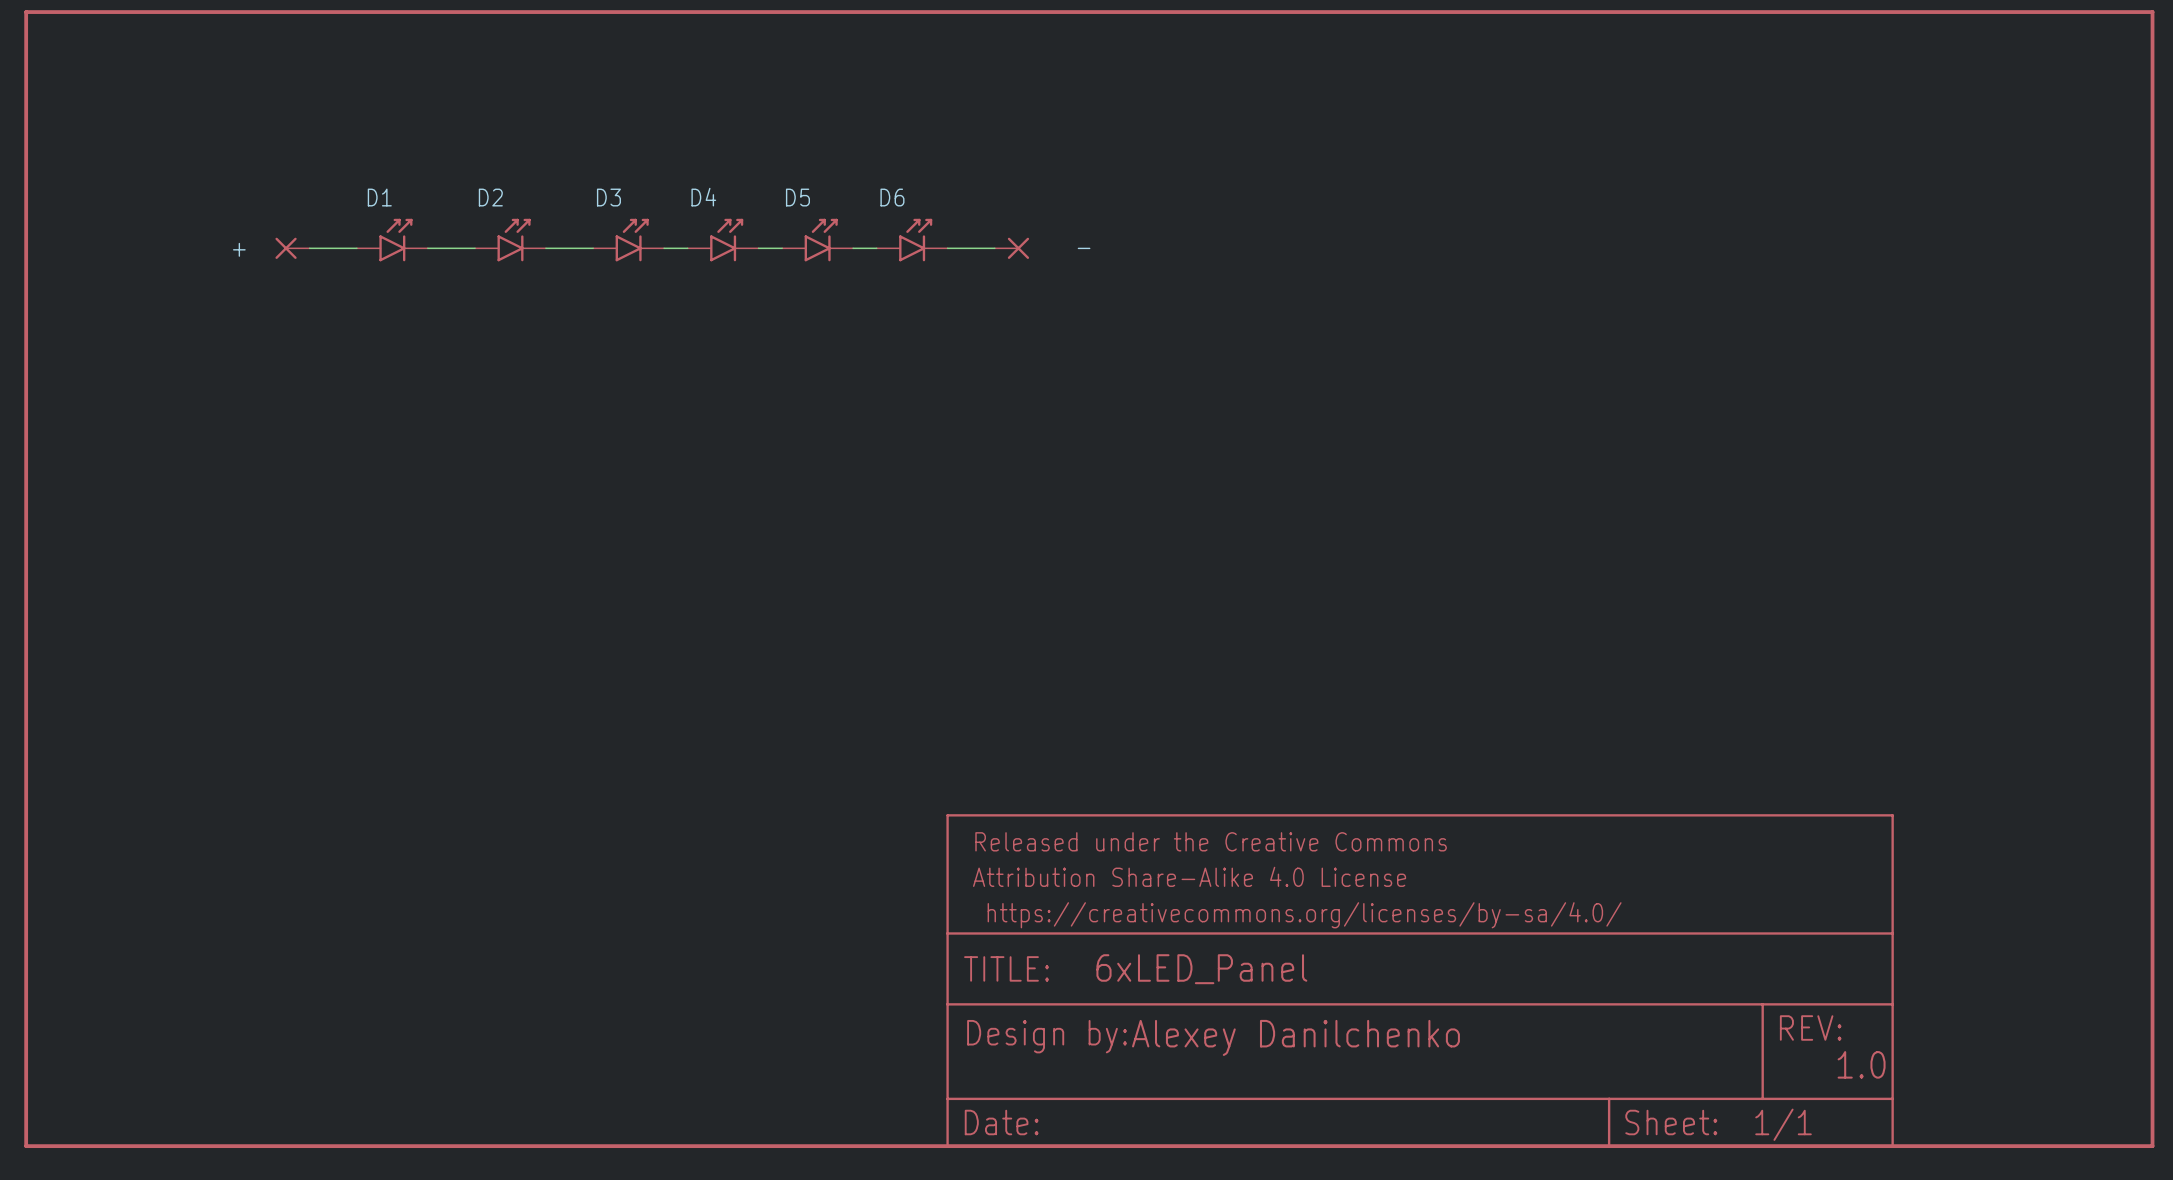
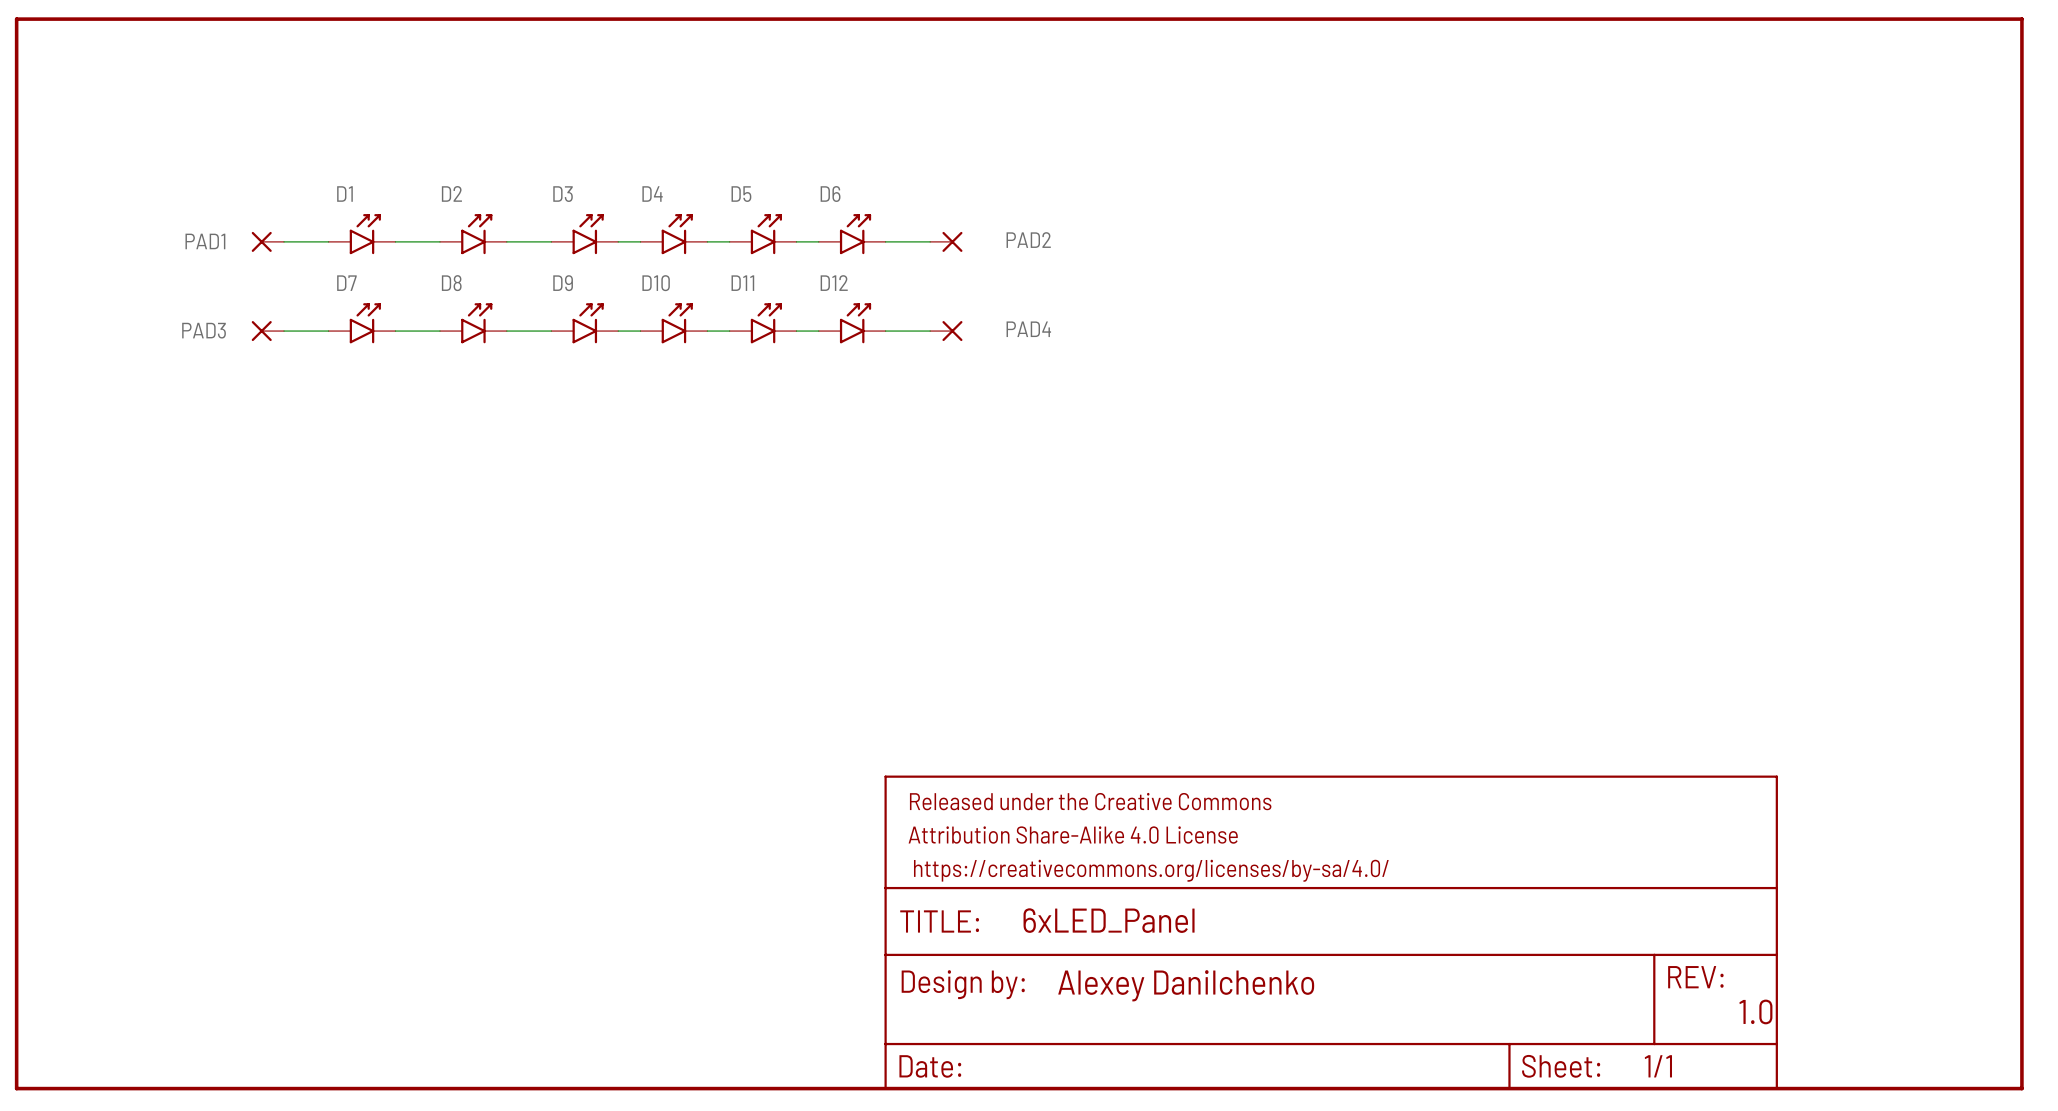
PAD2 name: - (1084, 248) -> PAD2 (1028, 240)
PAD1 name: + (239, 249) -> PAD1 (205, 241)
D7: none -> (362, 323)
D8: none -> (473, 323)
D9: none -> (584, 323)
D10: none -> (673, 323)
D11: none -> (763, 323)
D12: none -> (852, 323)
PAD3: none -> (267, 331)
wire: none -> (284, 331) (328, 331)
wire: none -> (395, 331) (439, 331)
wire: none -> (506, 331) (551, 331)
wire: none -> (618, 331) (640, 331)
wire: none -> (707, 331) (729, 331)
wire: none -> (796, 331) (818, 331)
wire: none -> (885, 331) (930, 331)
PAD4: none -> (946, 331)

